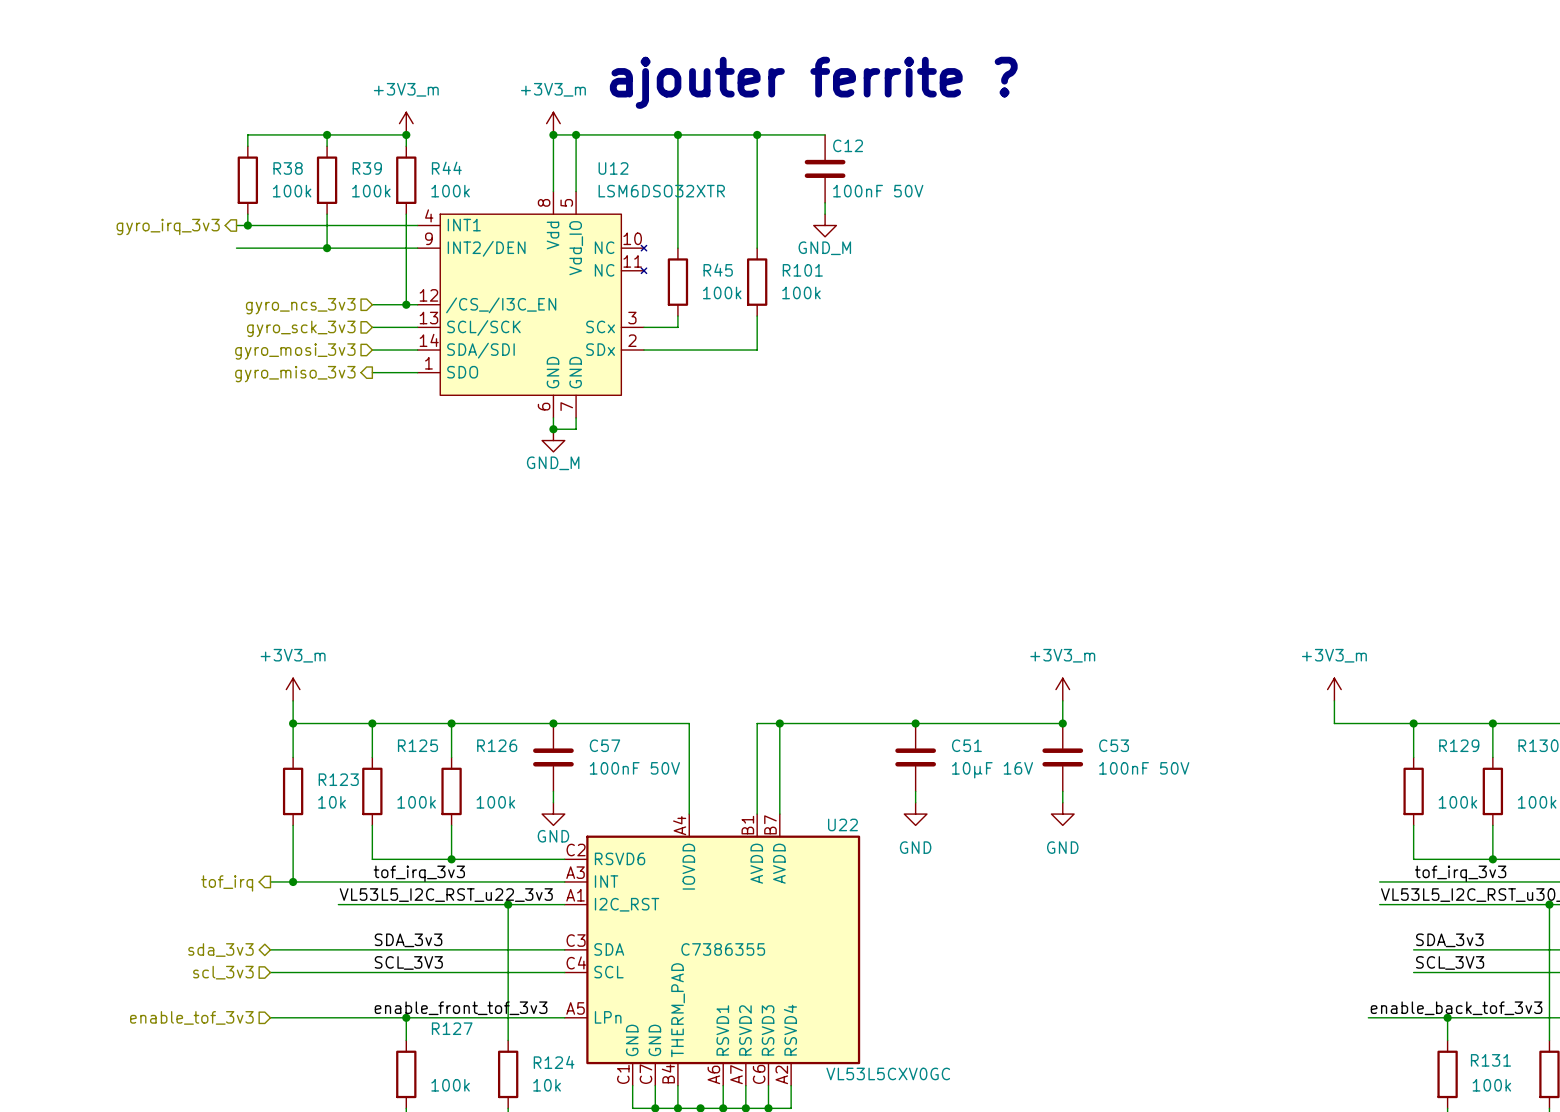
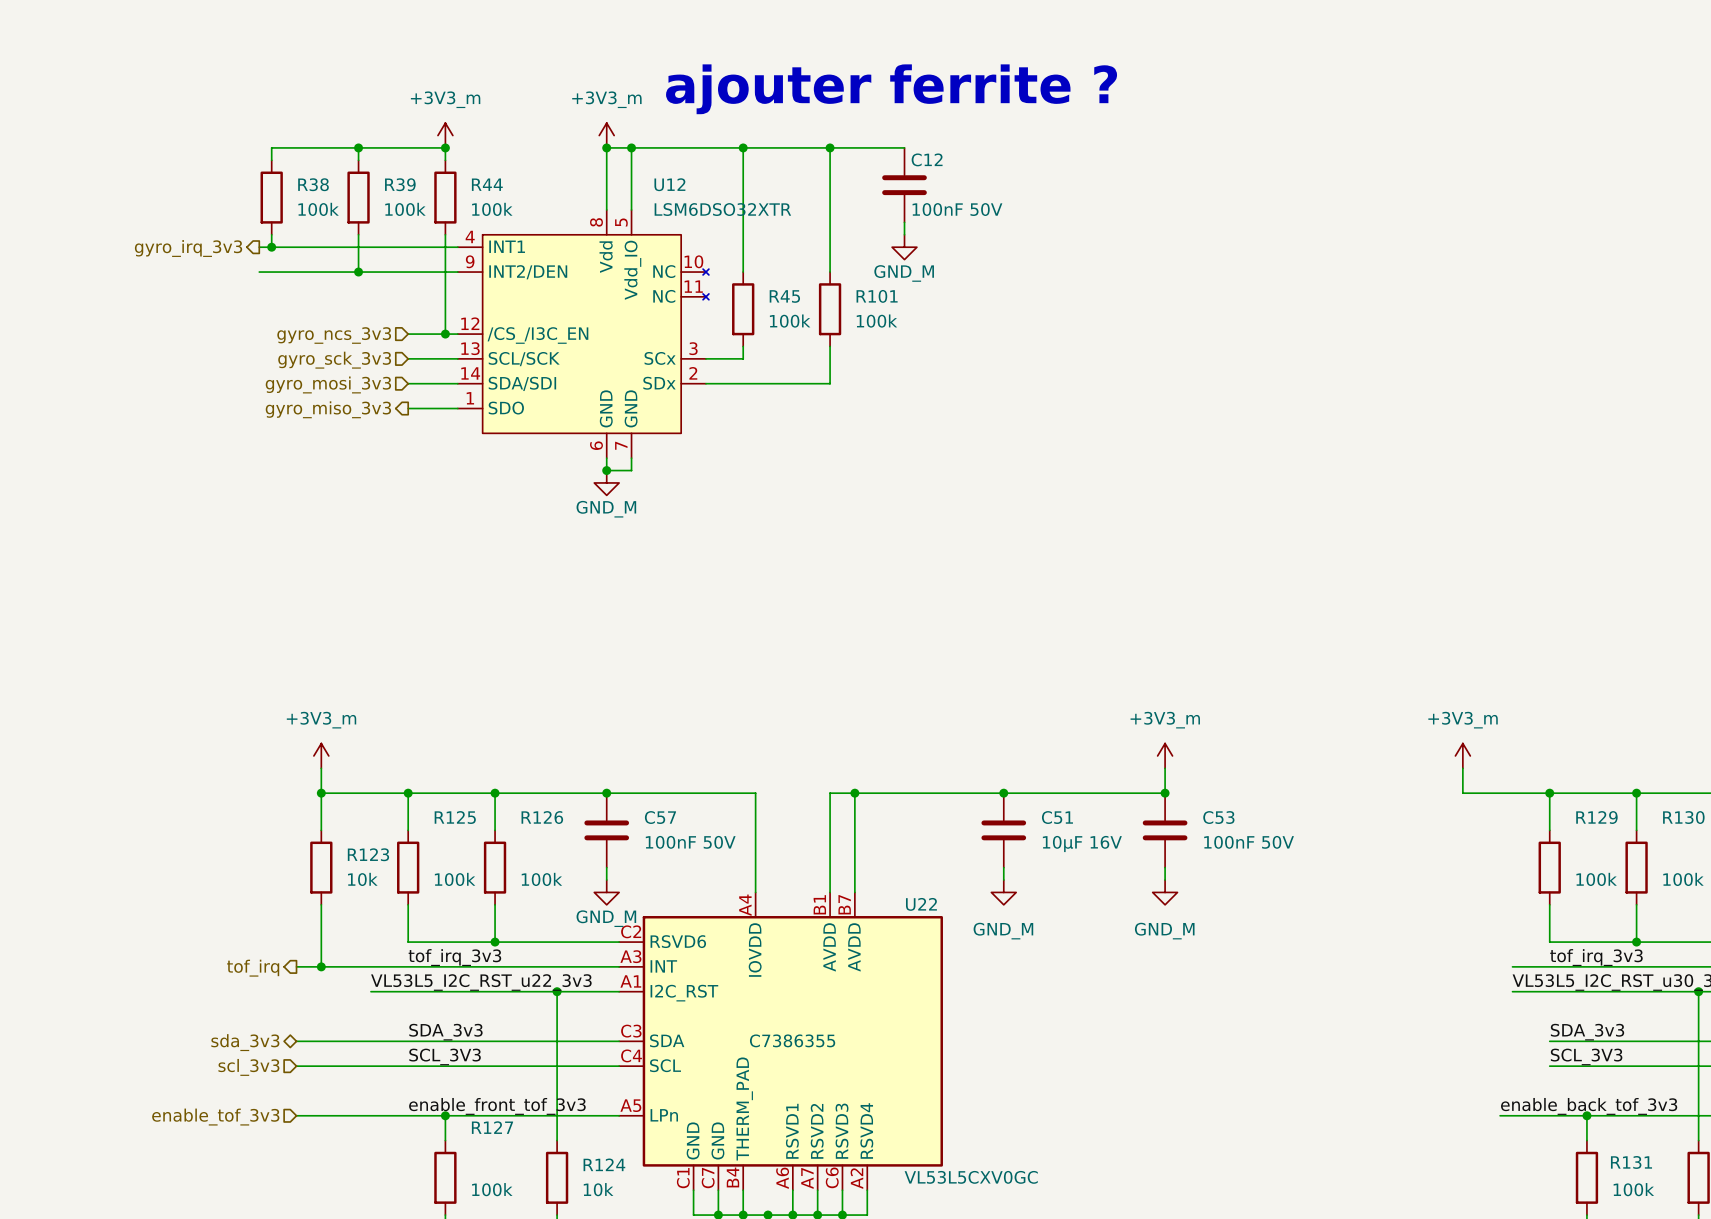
power symbol: GND (553, 814) -> GND_M (606, 892)
power symbol: GND (915, 814) -> GND_M (1003, 892)
power symbol: GND (1062, 814) -> GND_M (1165, 892)

